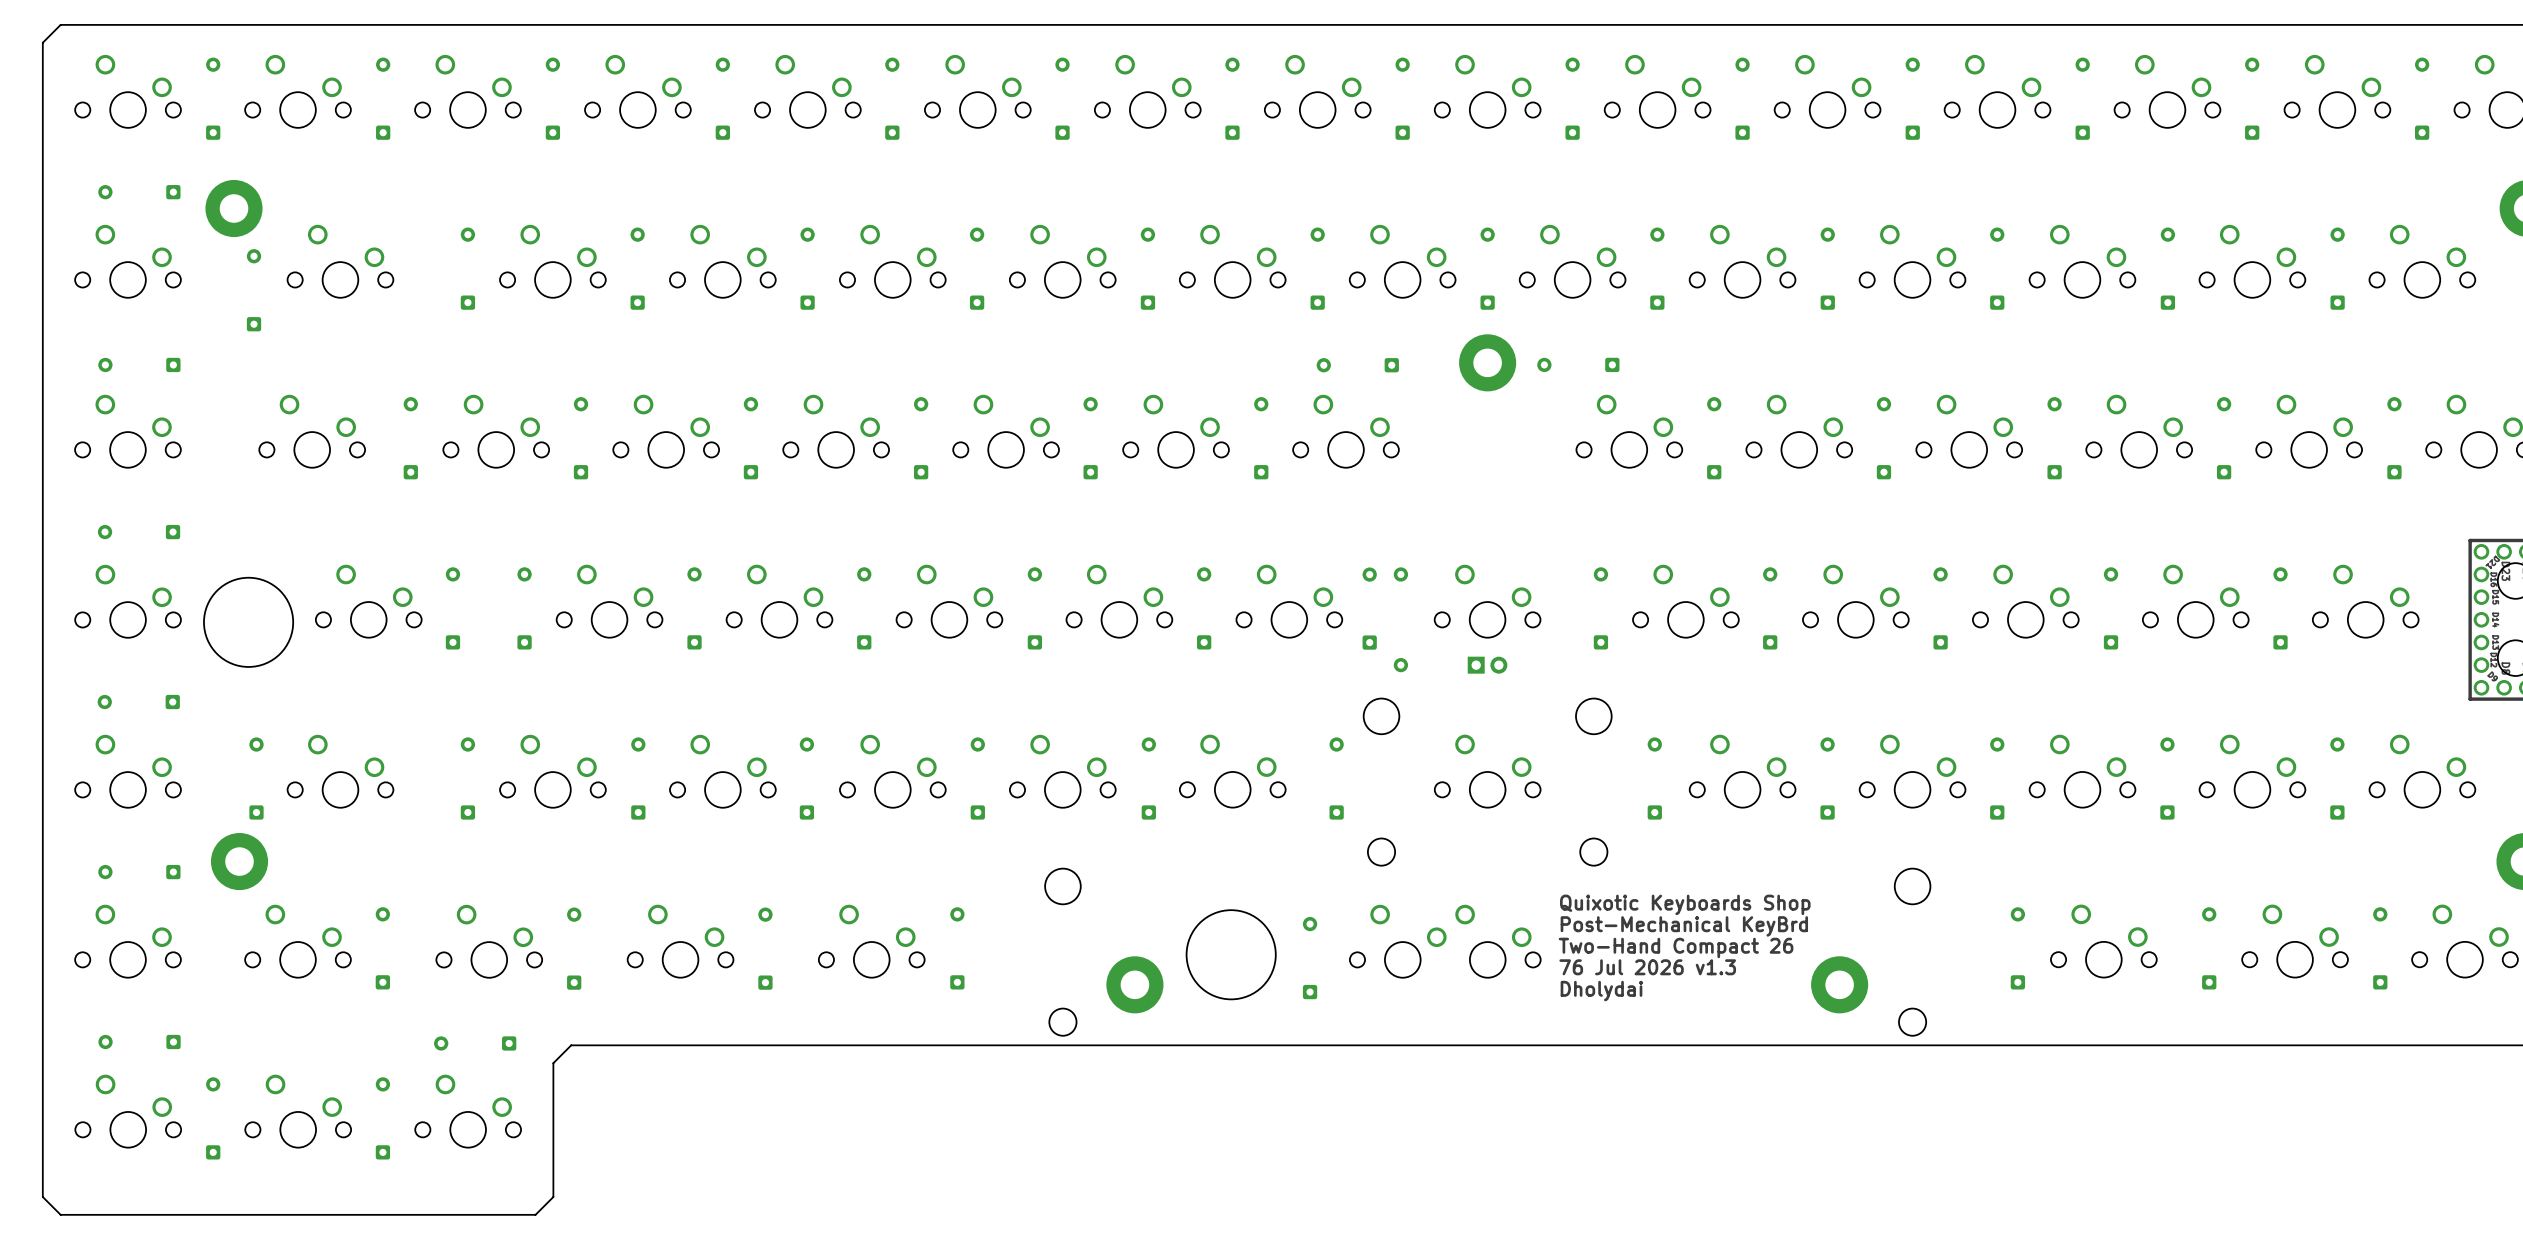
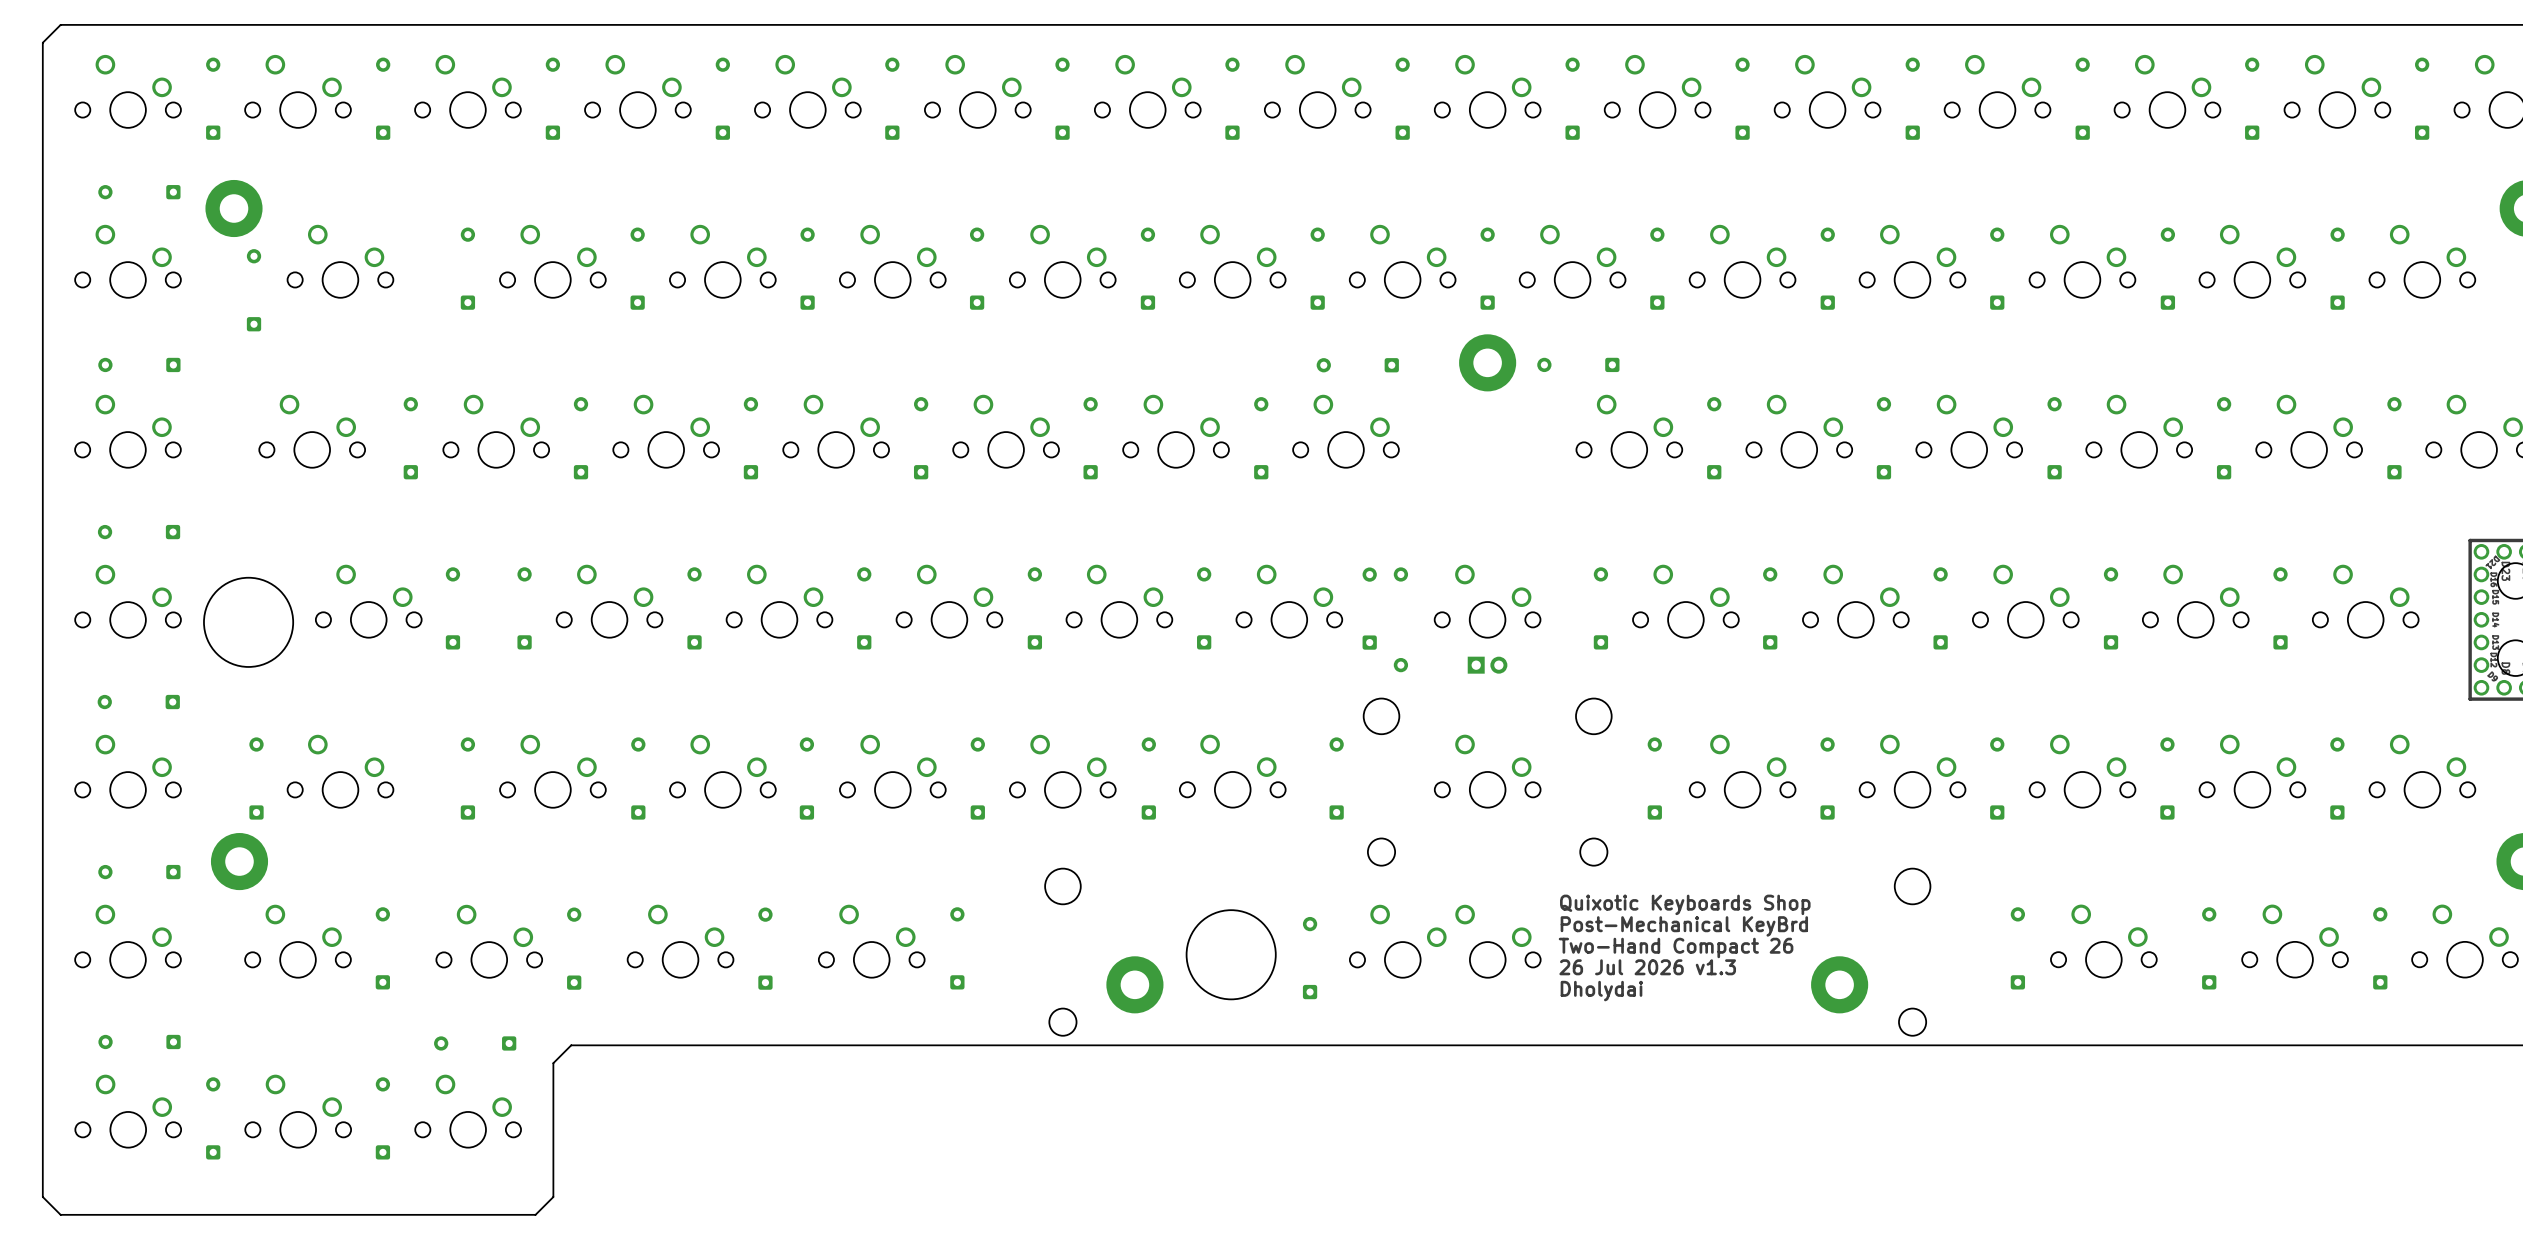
text: 76 Jul 2026 v1.3 (1647, 967) -> 26 Jul 2026 v1.3 (1647, 967)

